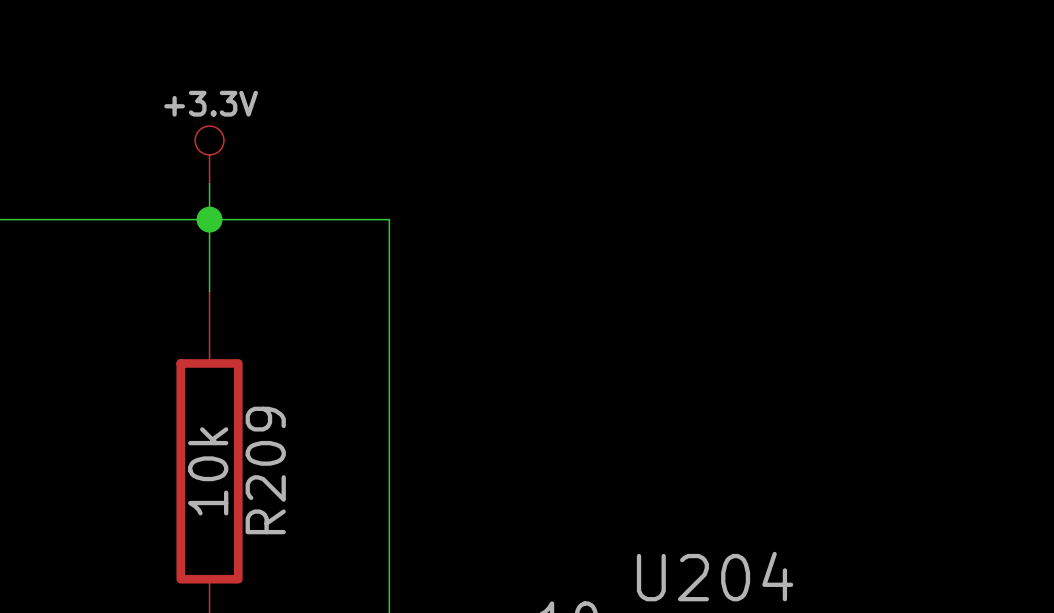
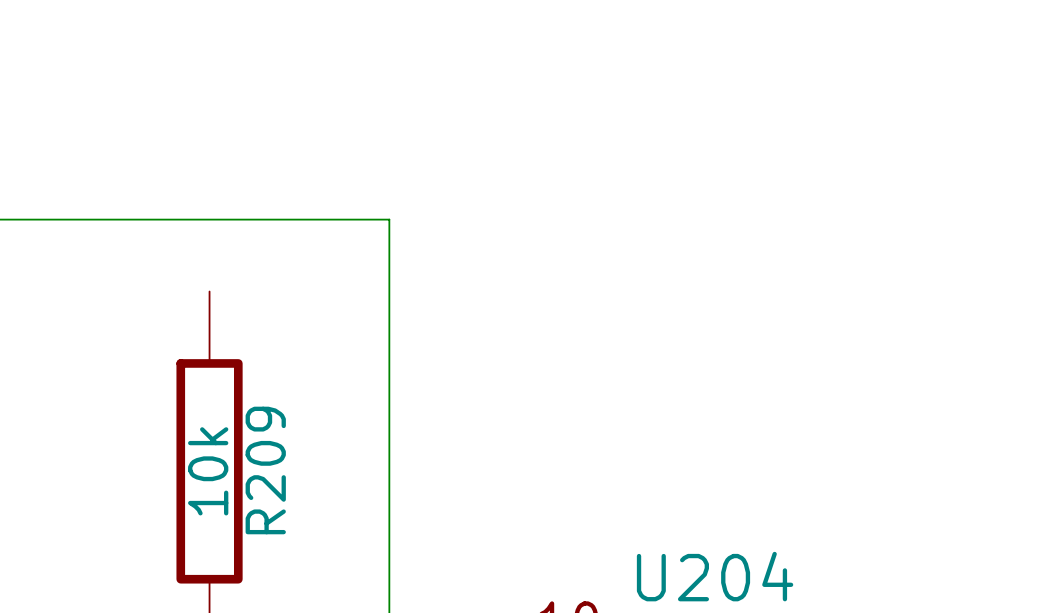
power symbol: +3.3V (209, 154) -> none
wire: (209, 183) (209, 291) -> none
junction: (209, 219) -> none

